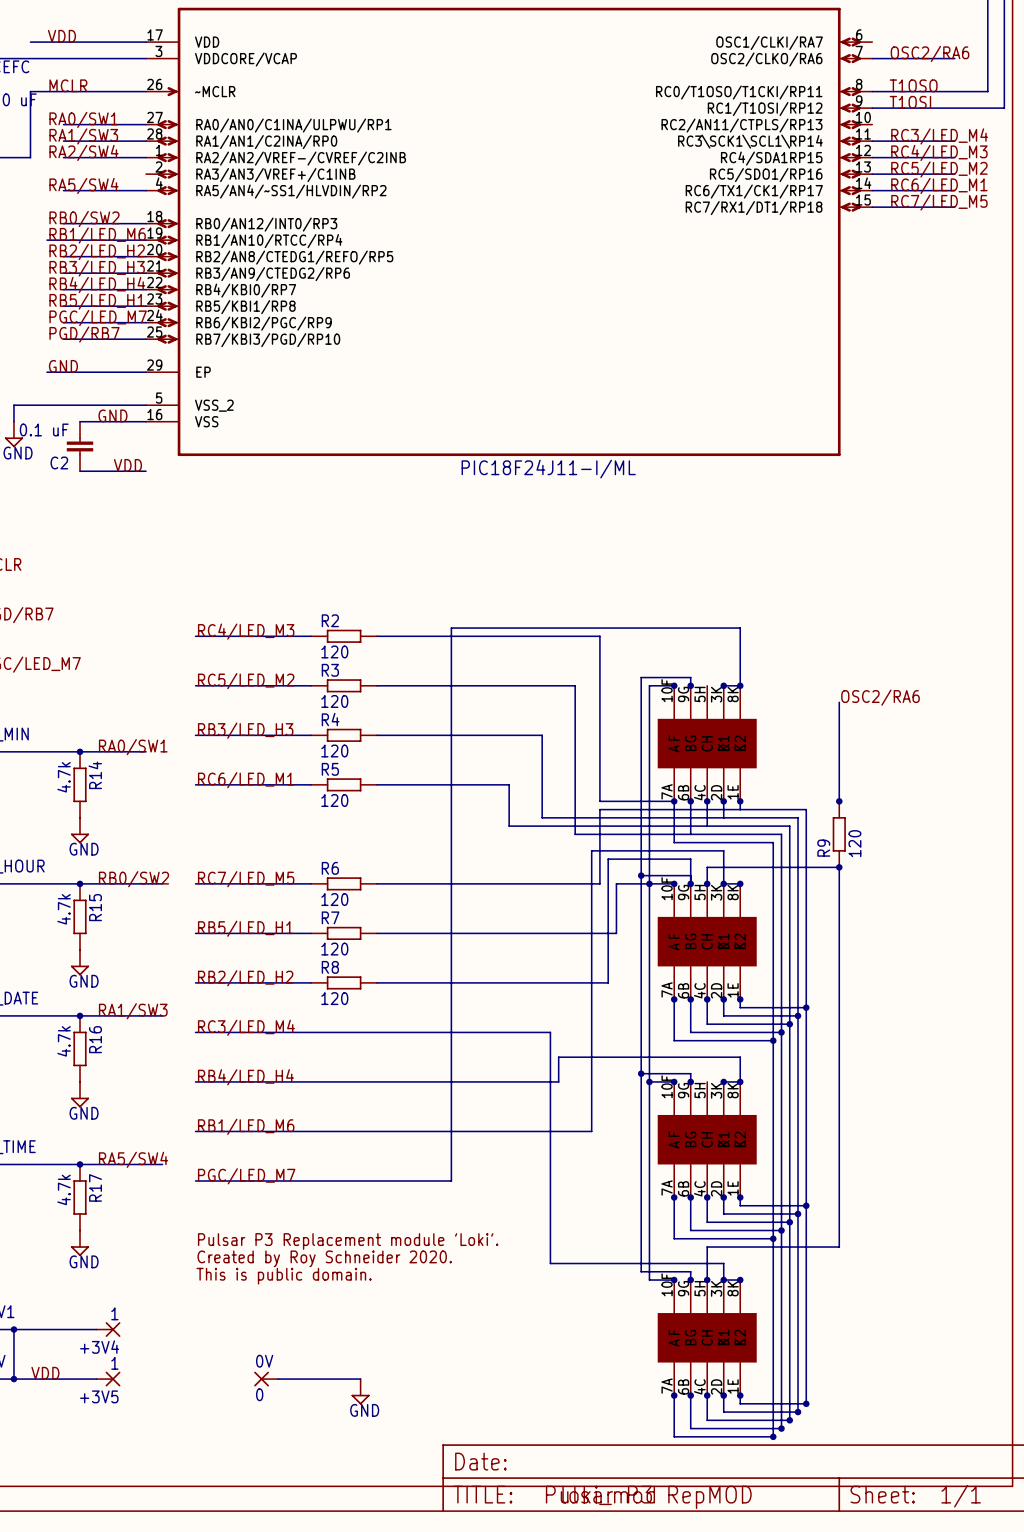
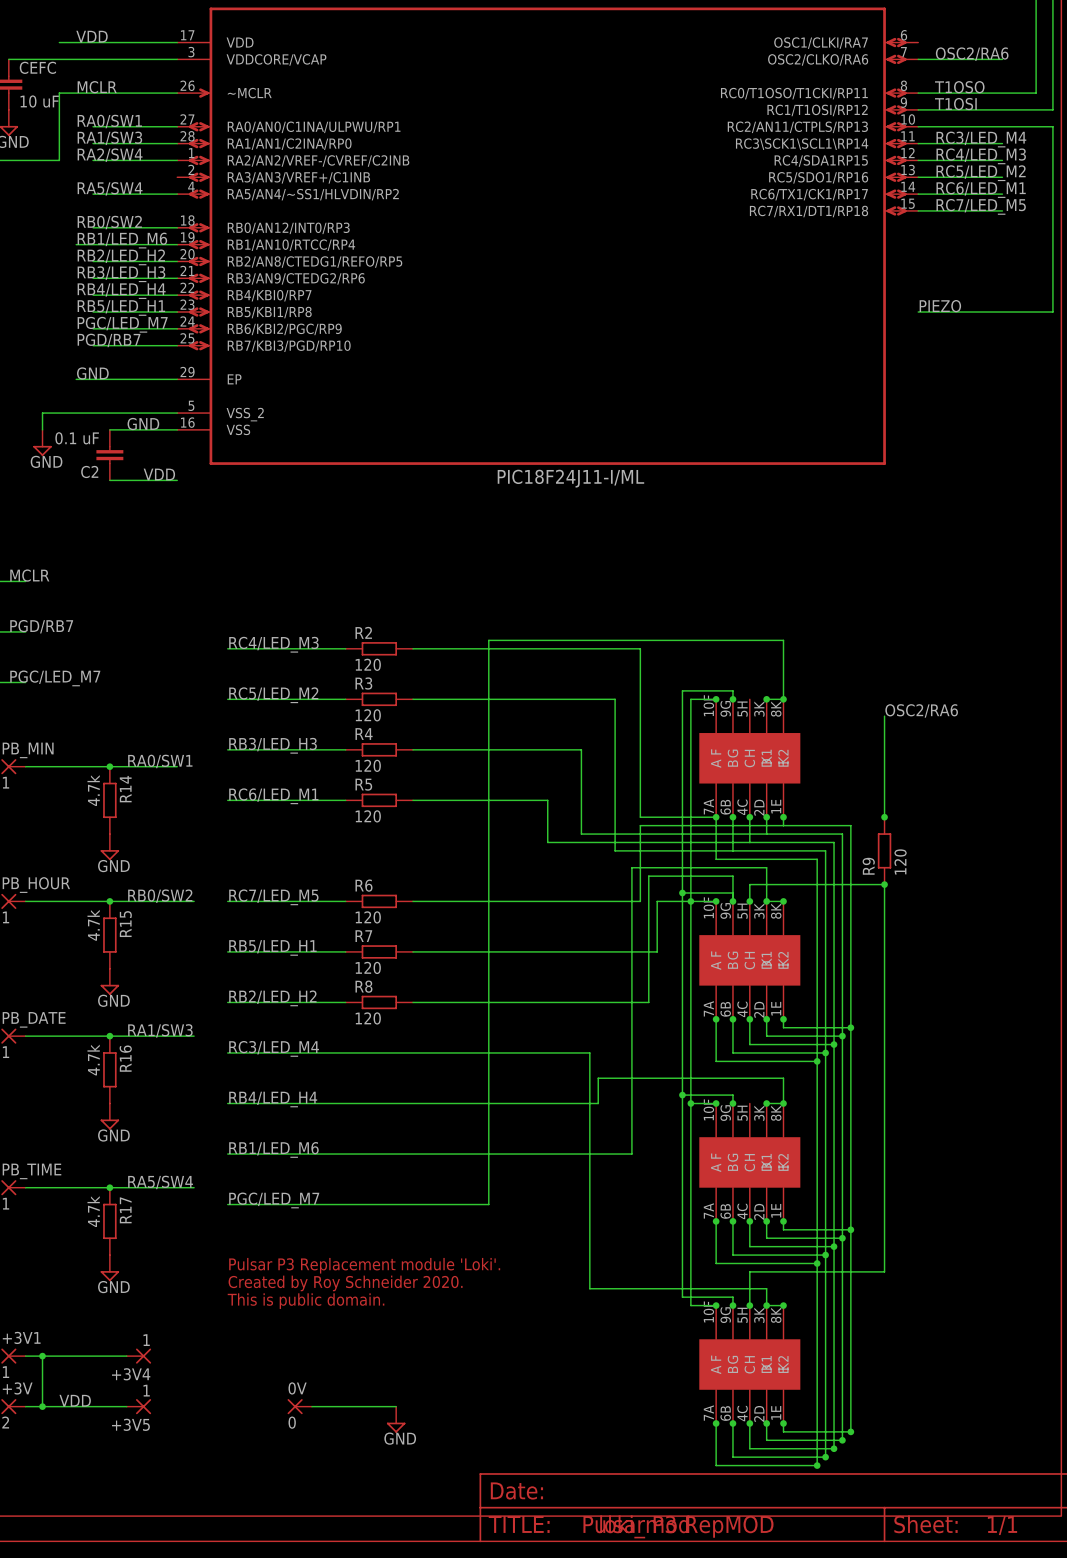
wire: none -> (918, 126) (1052, 126) (1052, 312) (918, 312)
label: none -> PIEZO (940, 306)

